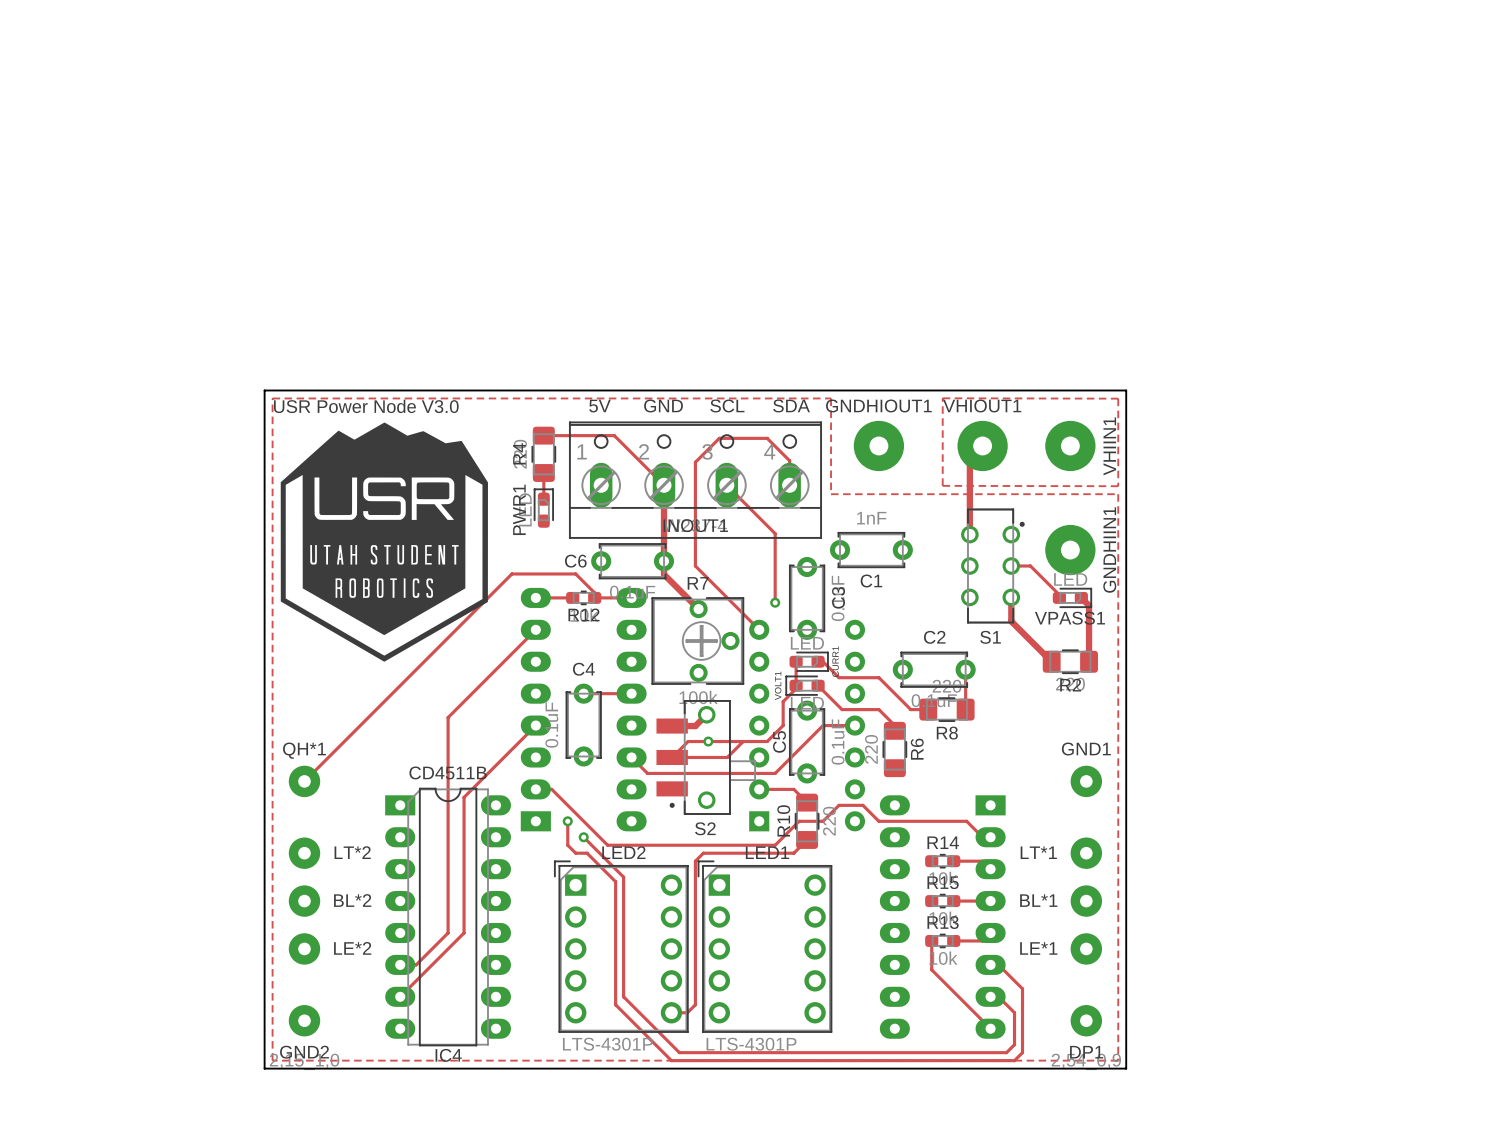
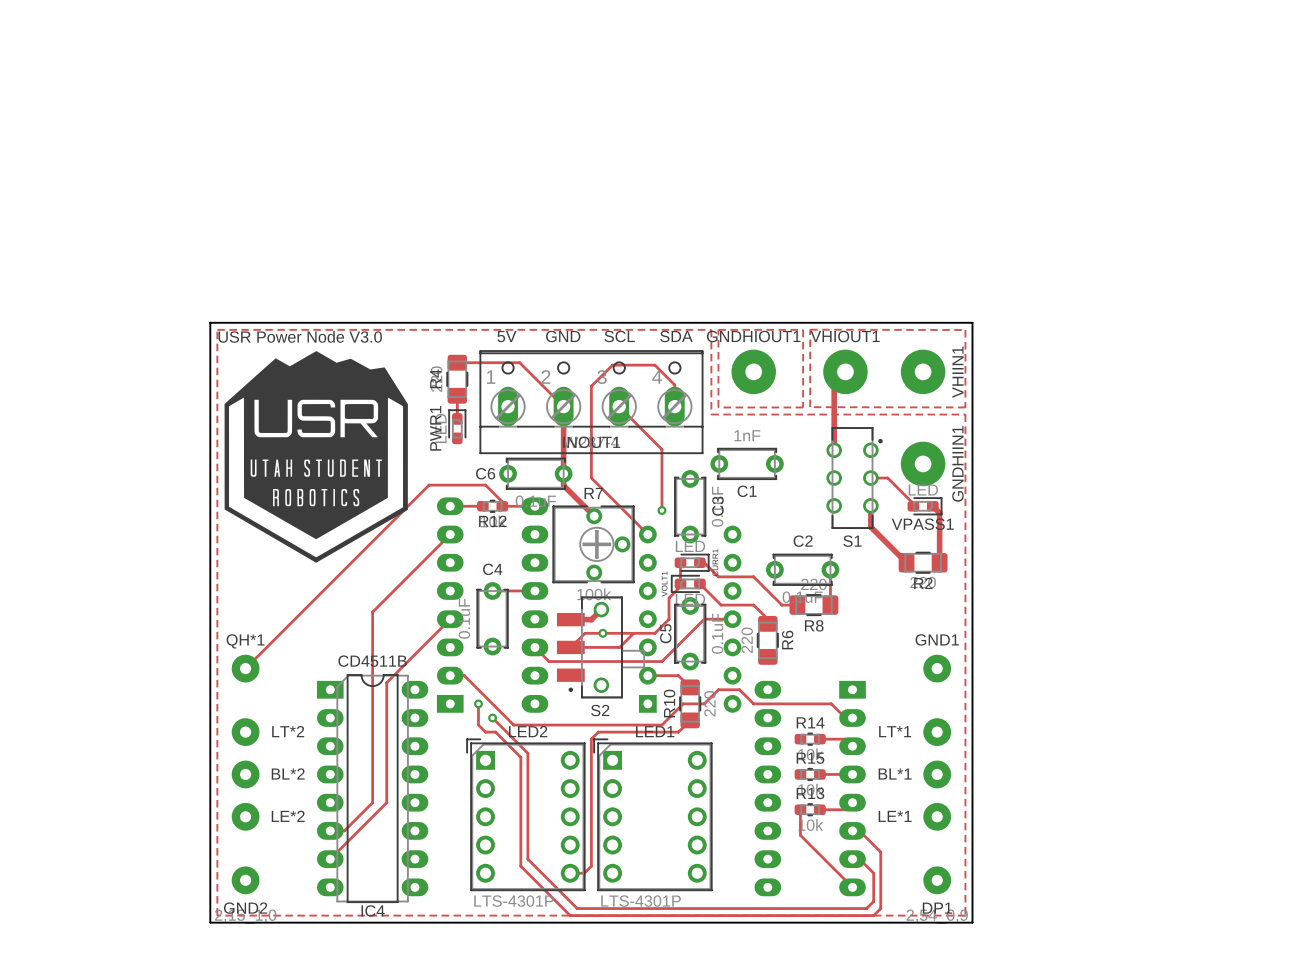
zone outline: none -> (718, 329) (718, 407) (803, 407) (803, 329) (718, 329)

